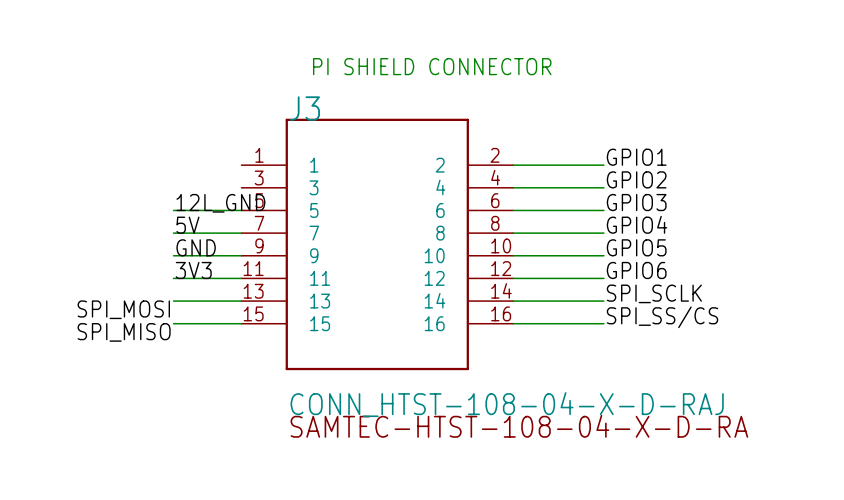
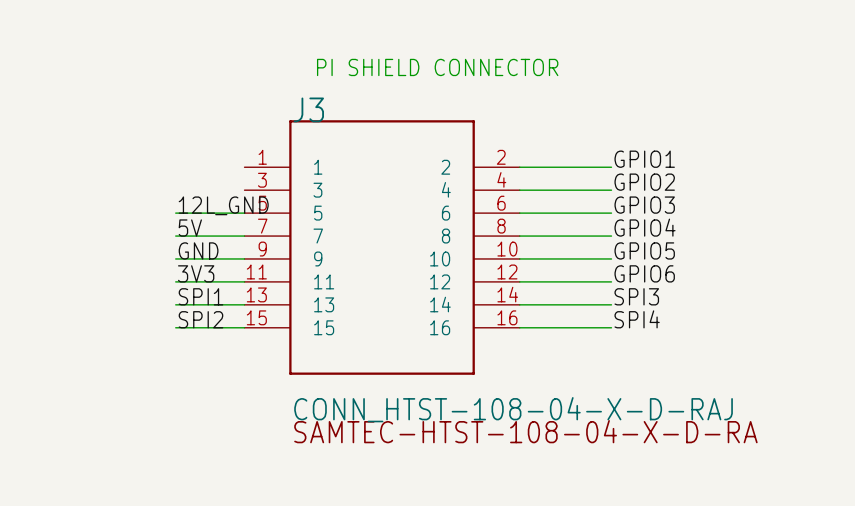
label: SPI_SCLK (654, 293) -> SPI3 (636, 296)
label: SPI_MOSI (123, 309) -> SPI1 (200, 296)
label: SPI_SS/CS (662, 317) -> SPI4 (637, 319)
label: SPI_MISO (124, 332) -> SPI2 (200, 319)

